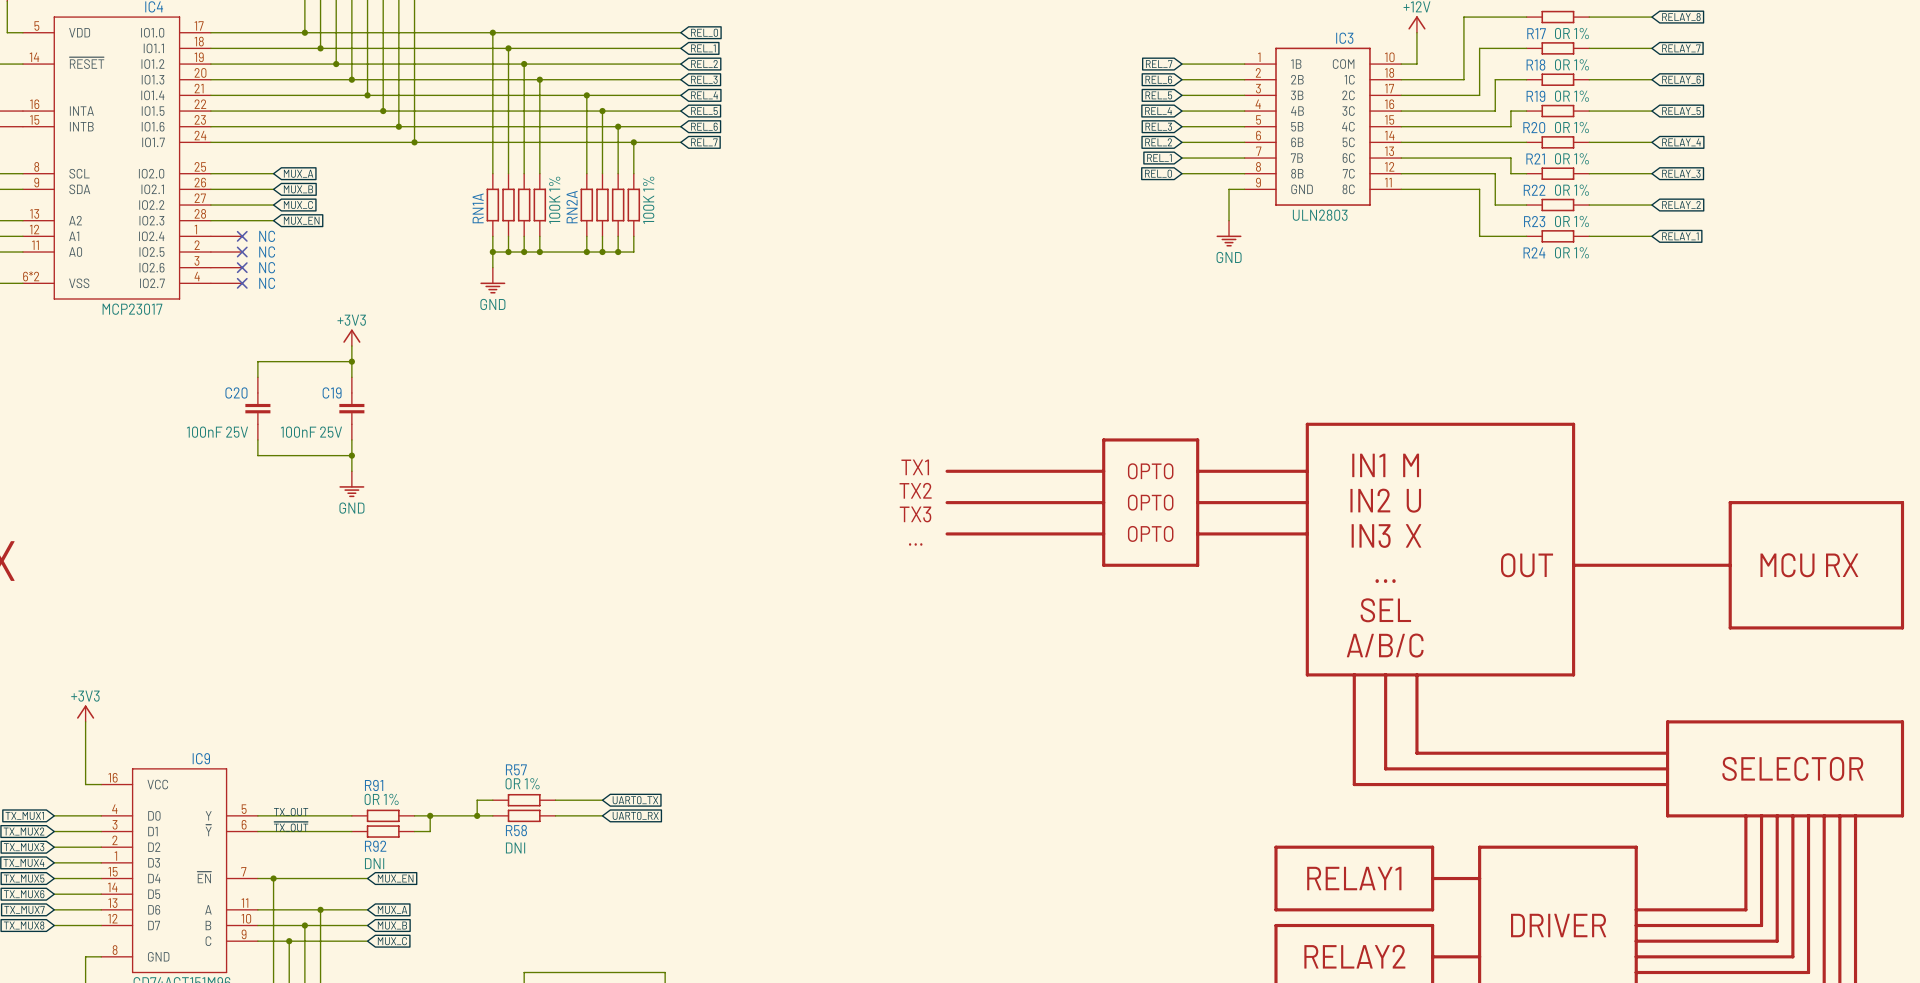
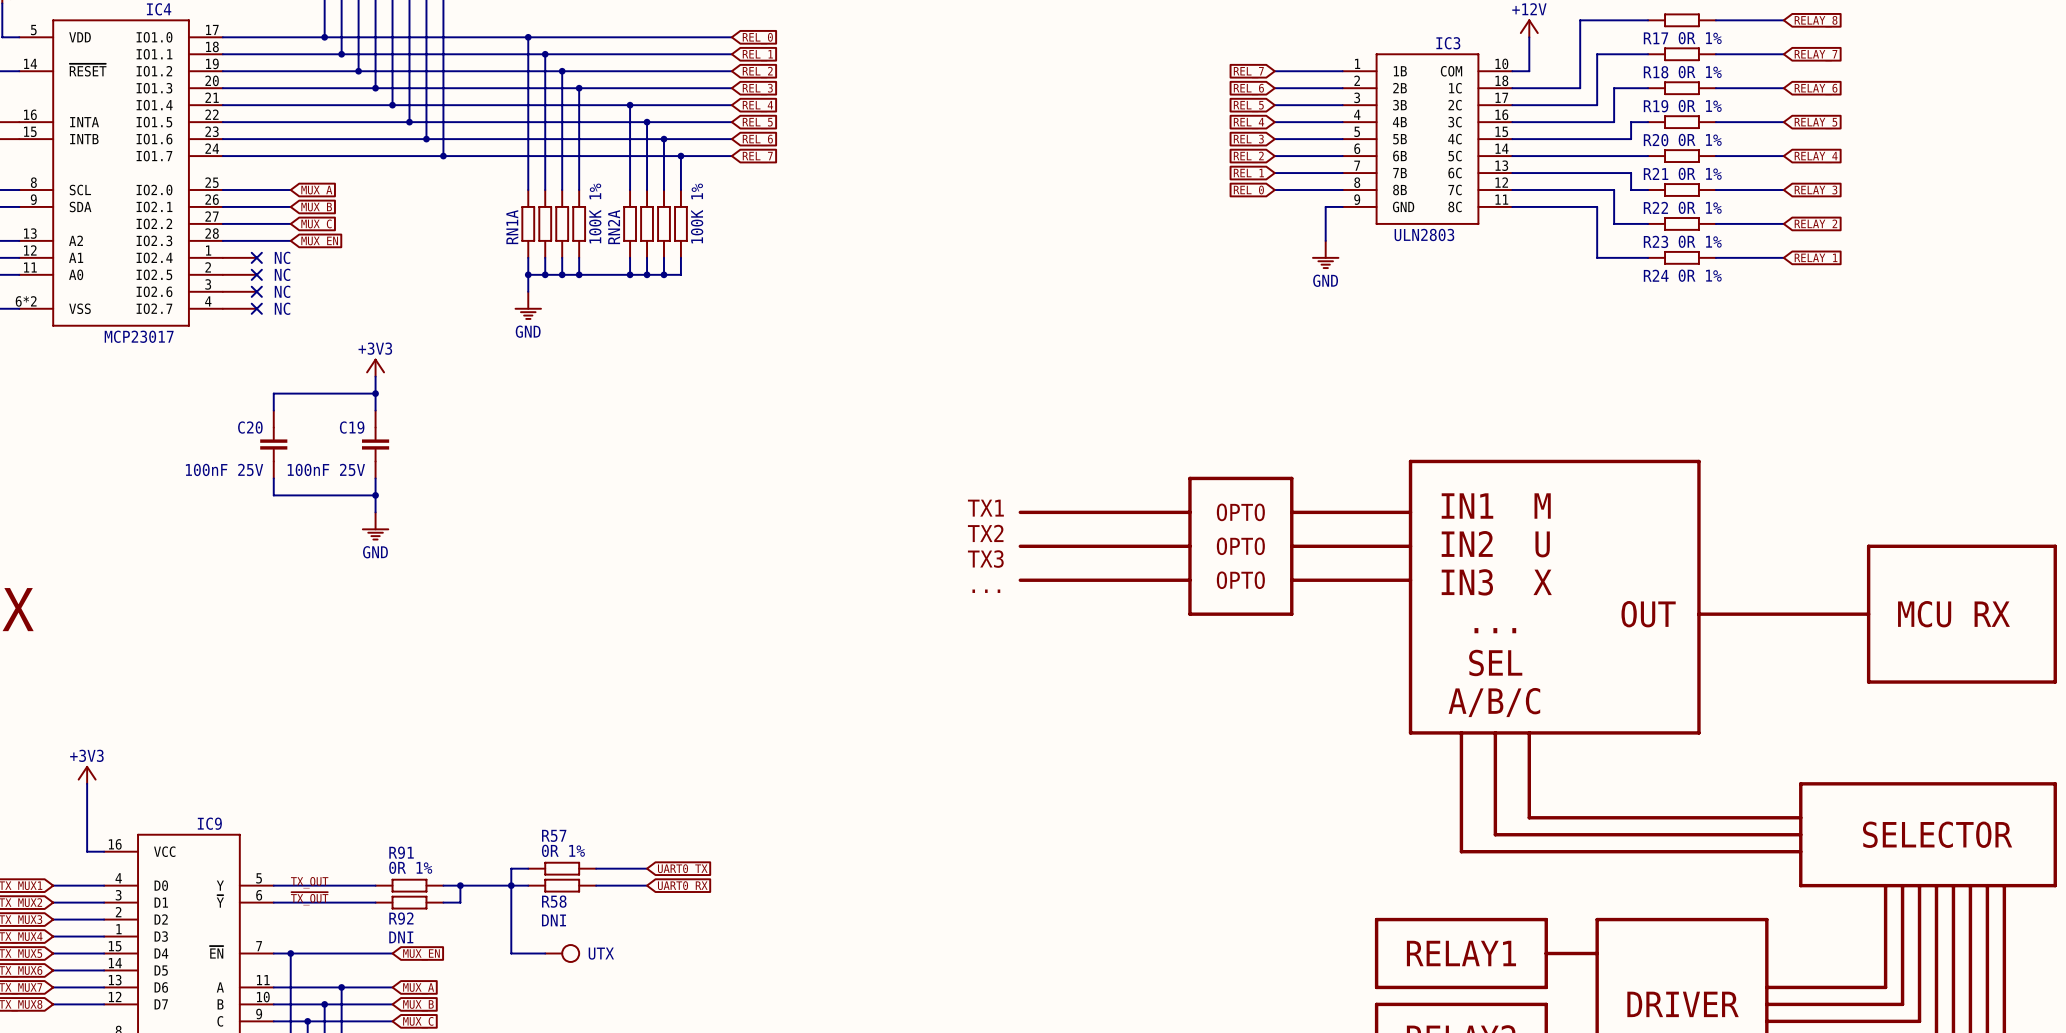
wire: none -> (511, 885) (511, 953) (545, 953)
UTX: none -> (562, 953)

